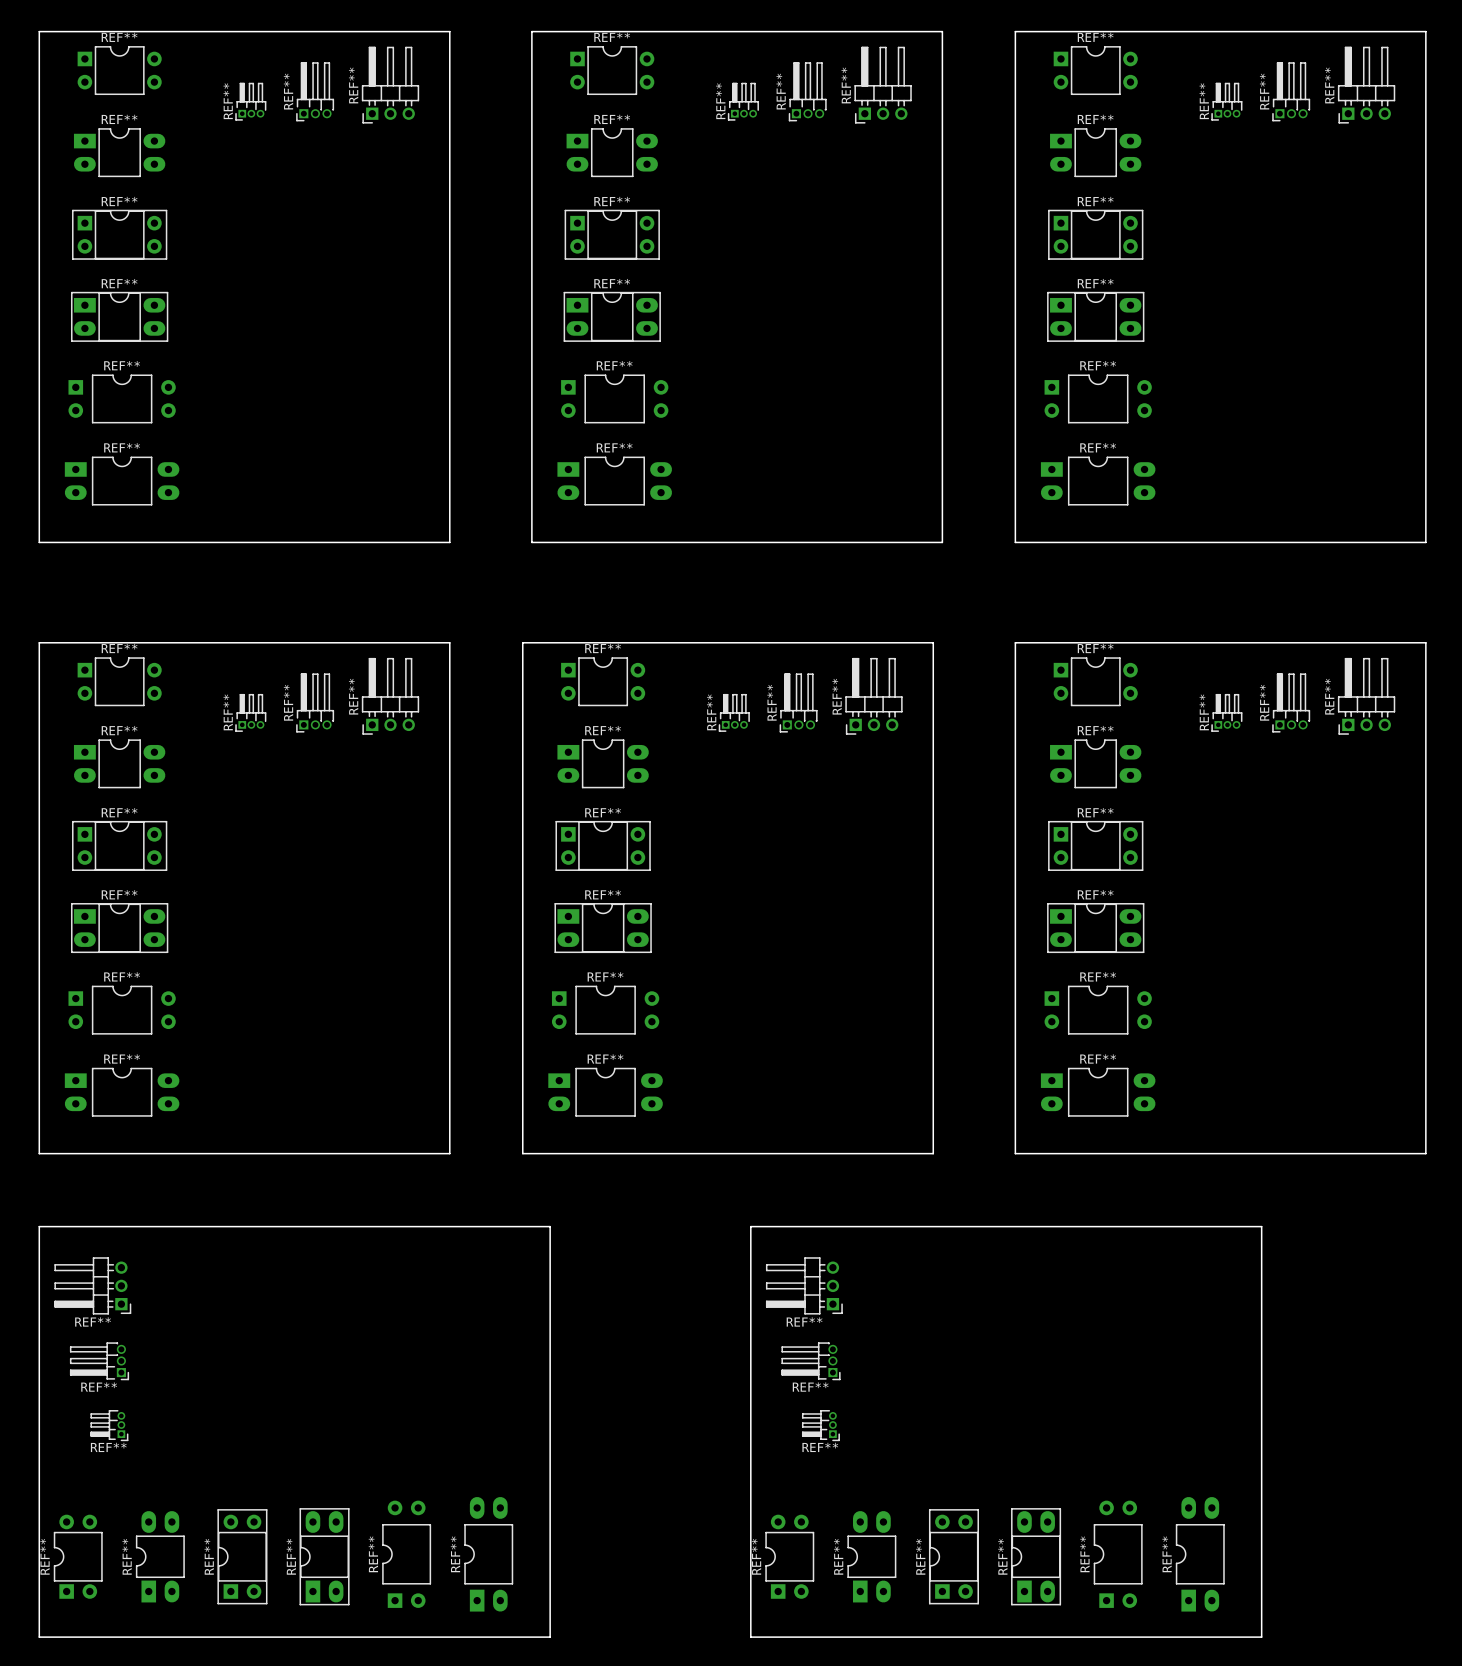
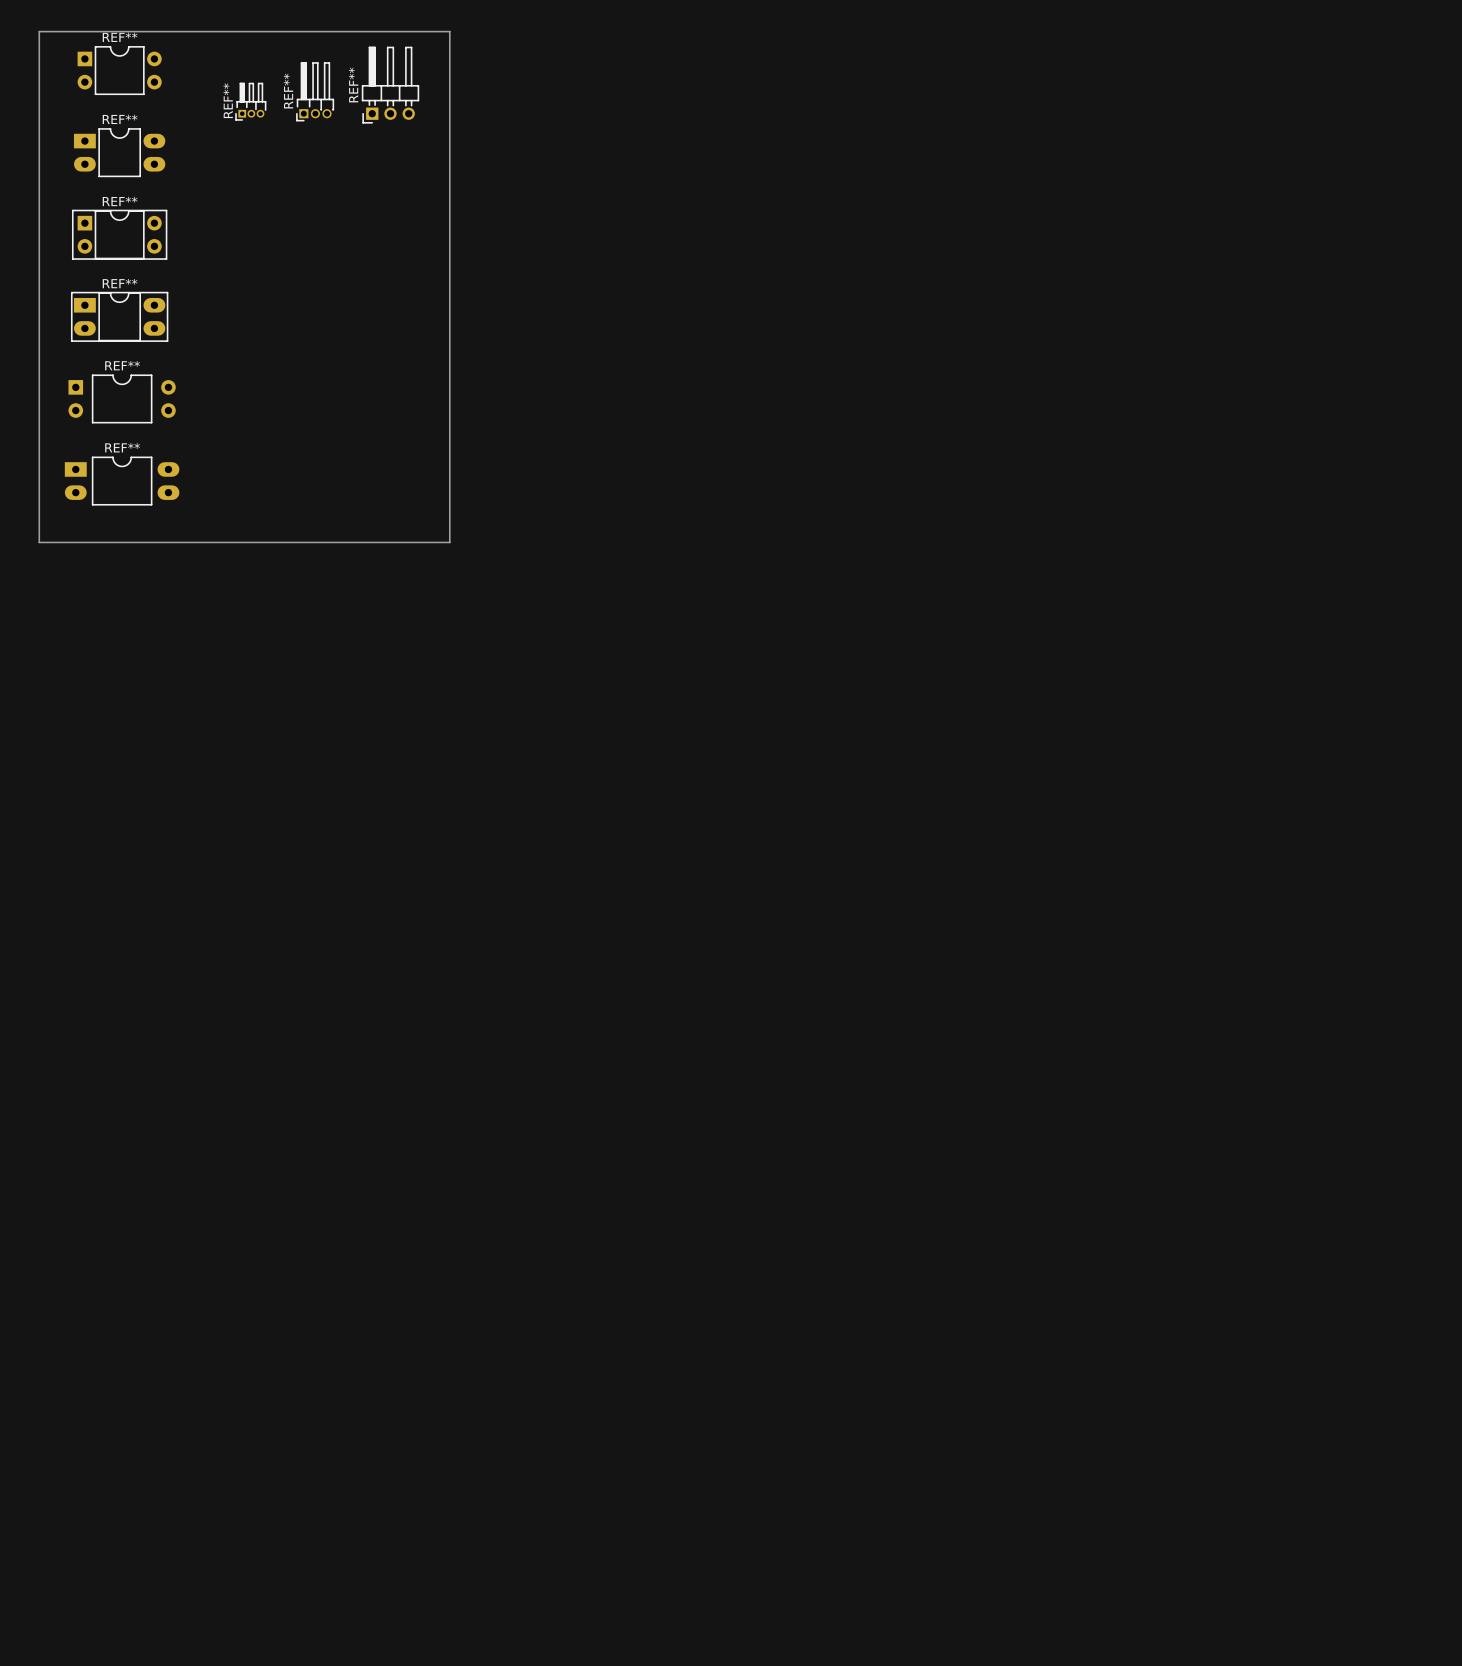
board edge: (531, 31) (942, 31) (942, 542) (531, 542) (531, 31) -> none
board edge: (1015, 31) (1015, 542) (1425, 542) (1425, 31) (1015, 31) -> none
REF**: (612, 70) -> none
REF**: (1095, 70) -> none
REF**: (883, 85) -> none
REF**: (1366, 85) -> none
REF**: (807, 91) -> none
REF**: (1291, 91) -> none
REF**: (743, 101) -> none
REF**: (1226, 101) -> none
REF**: (612, 152) -> none
REF**: (1095, 152) -> none
REF**: (612, 234) -> none
REF**: (1095, 234) -> none
REF**: (612, 316) -> none
REF**: (1095, 316) -> none
REF**: (614, 398) -> none
REF**: (1098, 398) -> none
REF**: (614, 481) -> none
REF**: (1098, 481) -> none
board edge: (39, 642) (39, 1153) (449, 1153) (449, 642) (39, 642) -> none
board edge: (522, 642) (933, 642) (933, 1153) (522, 1153) (522, 642) -> none
board edge: (1015, 642) (1425, 642) (1425, 1153) (1015, 1153) (1015, 642) -> none
REF**: (119, 681) -> none
REF**: (603, 681) -> none
REF**: (1095, 681) -> none
REF**: (390, 696) -> none
REF**: (873, 696) -> none
REF**: (1366, 696) -> none
REF**: (315, 703) -> none
REF**: (798, 703) -> none
REF**: (1291, 703) -> none
REF**: (250, 712) -> none
REF**: (734, 712) -> none
REF**: (1226, 712) -> none
REF**: (119, 763) -> none
REF**: (603, 763) -> none
REF**: (1095, 763) -> none
REF**: (119, 845) -> none
REF**: (603, 845) -> none
REF**: (1095, 845) -> none
REF**: (119, 928) -> none
REF**: (603, 928) -> none
REF**: (1095, 928) -> none
REF**: (122, 1010) -> none
REF**: (605, 1010) -> none
REF**: (1098, 1010) -> none
REF**: (122, 1092) -> none
REF**: (605, 1092) -> none
REF**: (1098, 1092) -> none
board edge: (39, 1226) (550, 1226) (550, 1637) (39, 1637) (39, 1226) -> none
board edge: (750, 1226) (750, 1637) (1261, 1637) (1261, 1226) (750, 1226) -> none
REF**: (92, 1285) -> none
REF**: (804, 1285) -> none
REF**: (99, 1361) -> none
REF**: (811, 1361) -> none
REF**: (109, 1425) -> none
REF**: (820, 1425) -> none
REF**: (406, 1554) -> none
REF**: (488, 1554) -> none
REF**: (1118, 1554) -> none
REF**: (1200, 1554) -> none
REF**: (78, 1556) -> none
REF**: (160, 1556) -> none
REF**: (242, 1556) -> none
REF**: (324, 1556) -> none
REF**: (789, 1556) -> none
REF**: (871, 1556) -> none
REF**: (953, 1556) -> none
REF**: (1036, 1556) -> none

